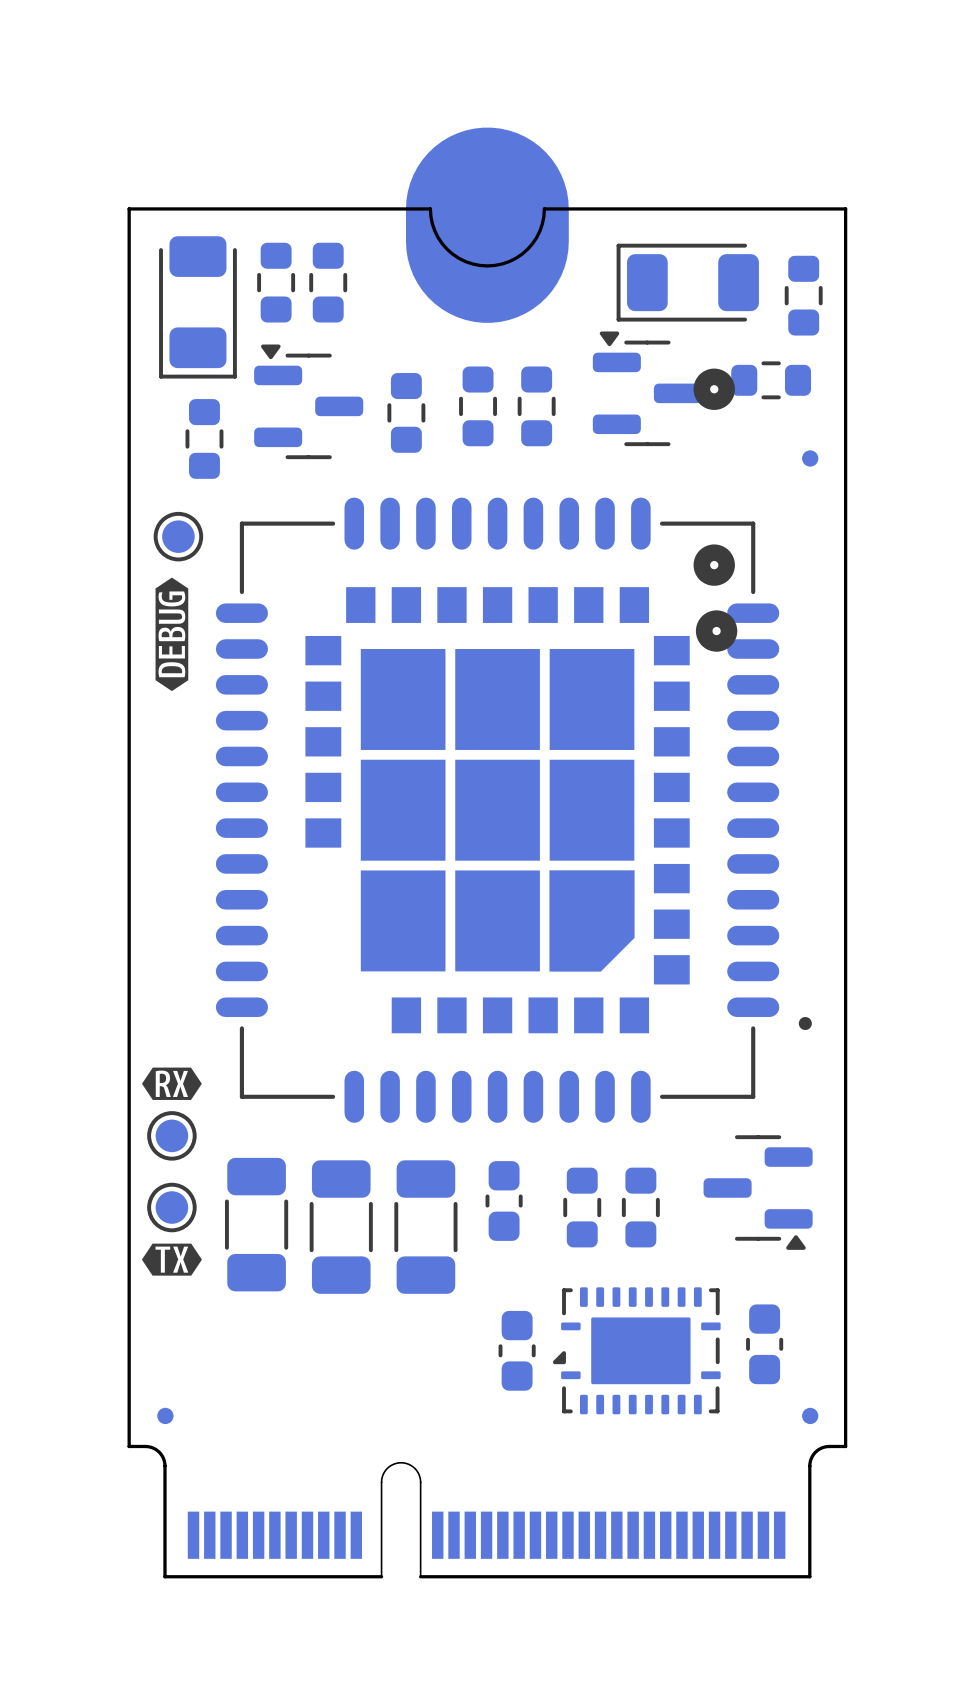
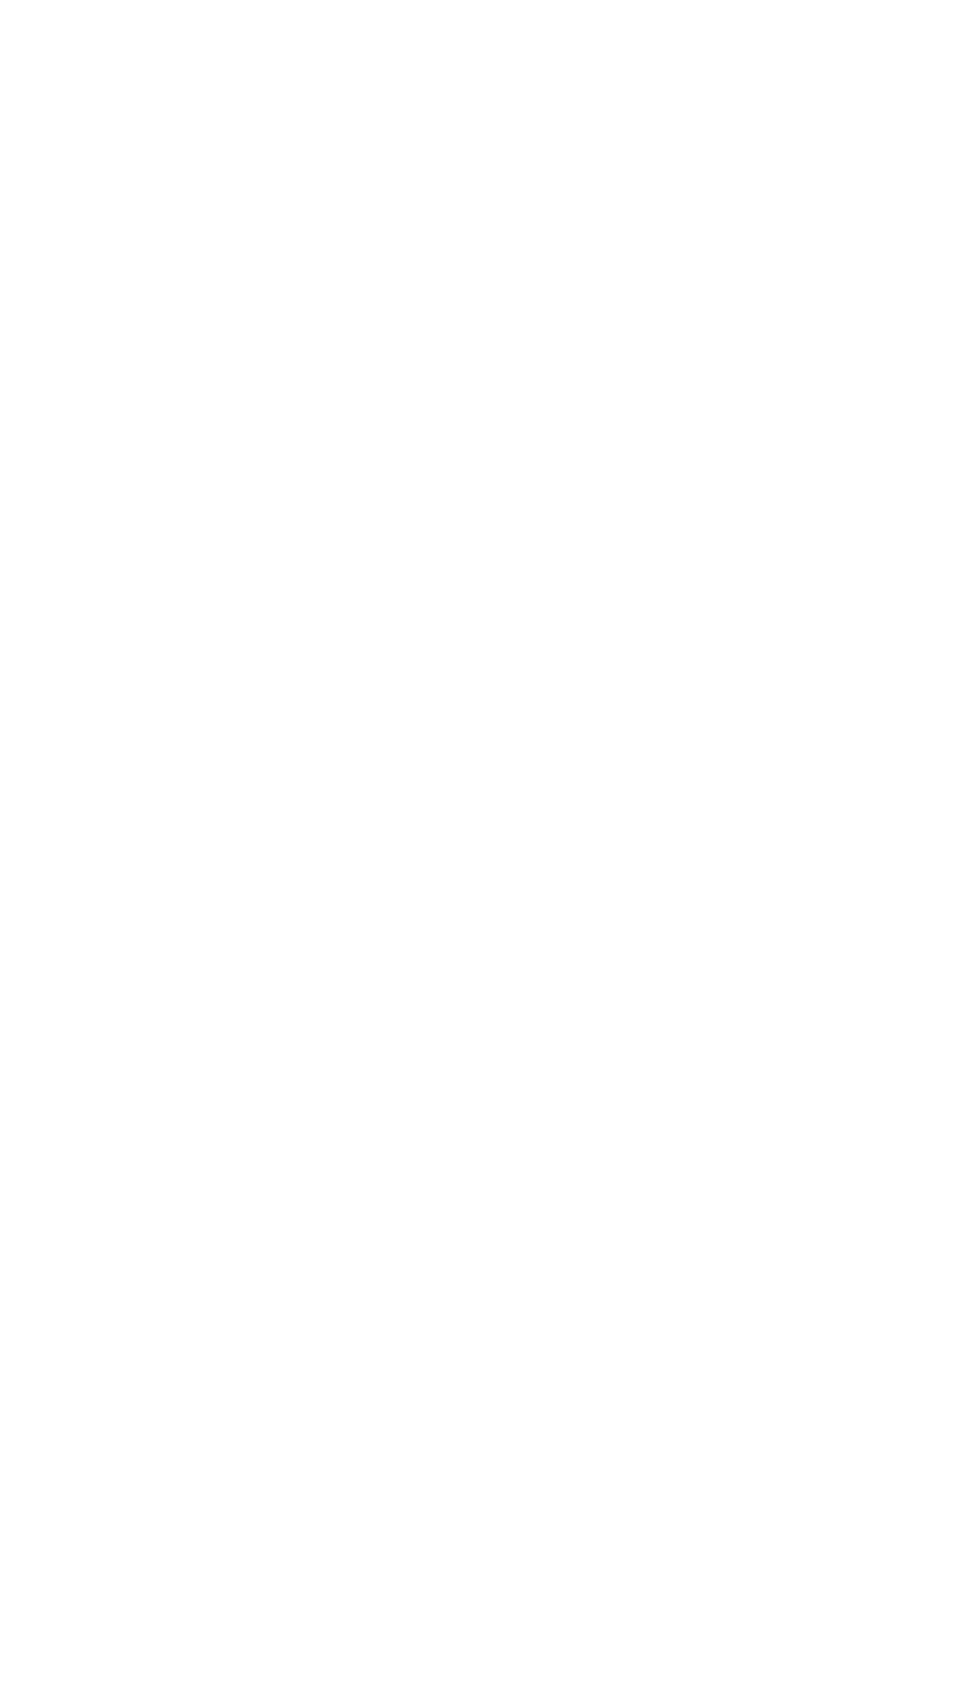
part: (276, 282) -> none
part: (328, 282) -> none
part: (687, 282) -> none
part: (803, 295) -> none
part: (197, 307) -> none
part: (771, 380) -> none
part: (647, 388) -> none
part: (714, 389) -> none
part: (308, 401) -> none
part: (478, 406) -> none
part: (536, 406) -> none
part: (406, 412) -> none
part: (204, 438) -> none
part: (810, 458) -> none
part: (178, 536) -> none
part: (714, 565) -> none
drawing: [155, 577, 189, 692] -> none
part: (716, 631) -> none
part: (513, 810) -> none
part: (487, 852) -> none
drawing: [141, 1067, 202, 1100] -> none
part: (171, 1135) -> none
part: (758, 1192) -> none
part: (504, 1201) -> none
part: (171, 1207) -> none
part: (582, 1207) -> none
part: (640, 1207) -> none
part: (256, 1224) -> none
part: (341, 1227) -> none
part: (425, 1227) -> none
drawing: [141, 1243, 202, 1276] -> none
part: (764, 1344) -> none
part: (517, 1350) -> none
part: (636, 1350) -> none
part: (165, 1415) -> none
part: (810, 1415) -> none

